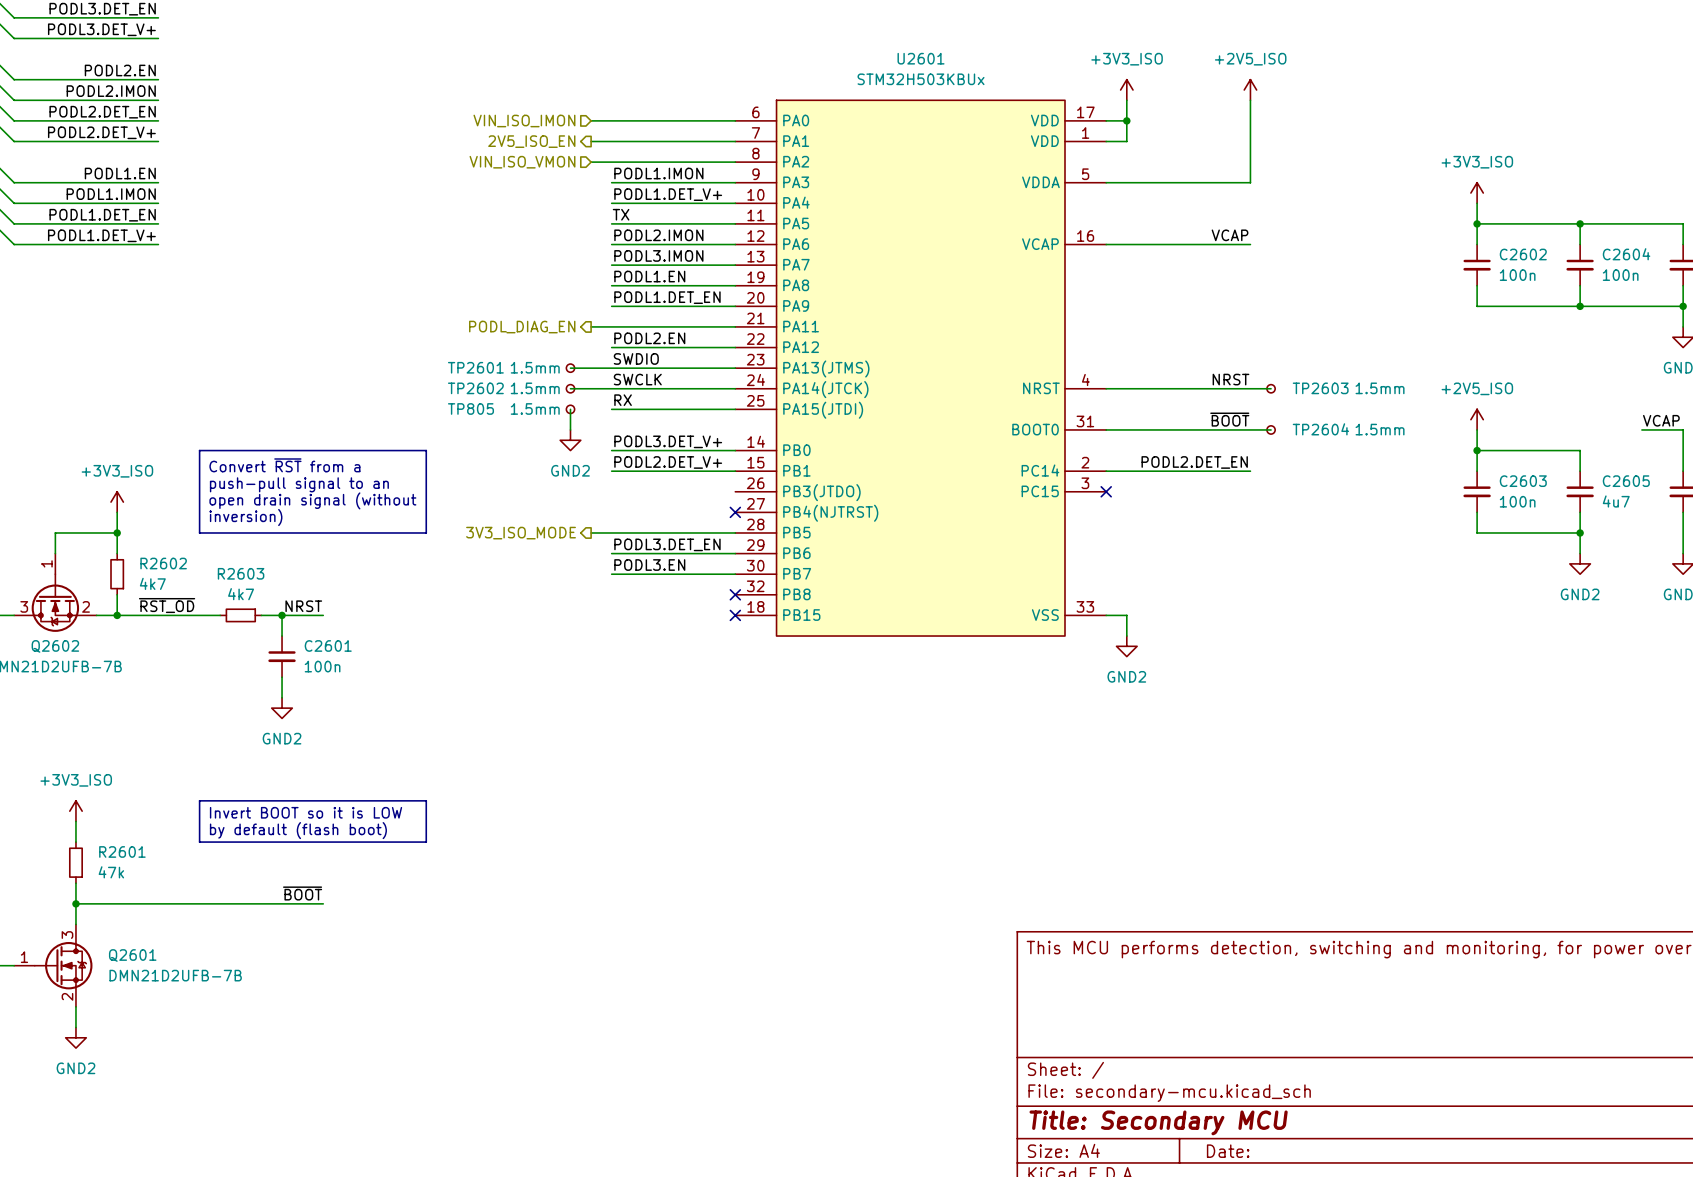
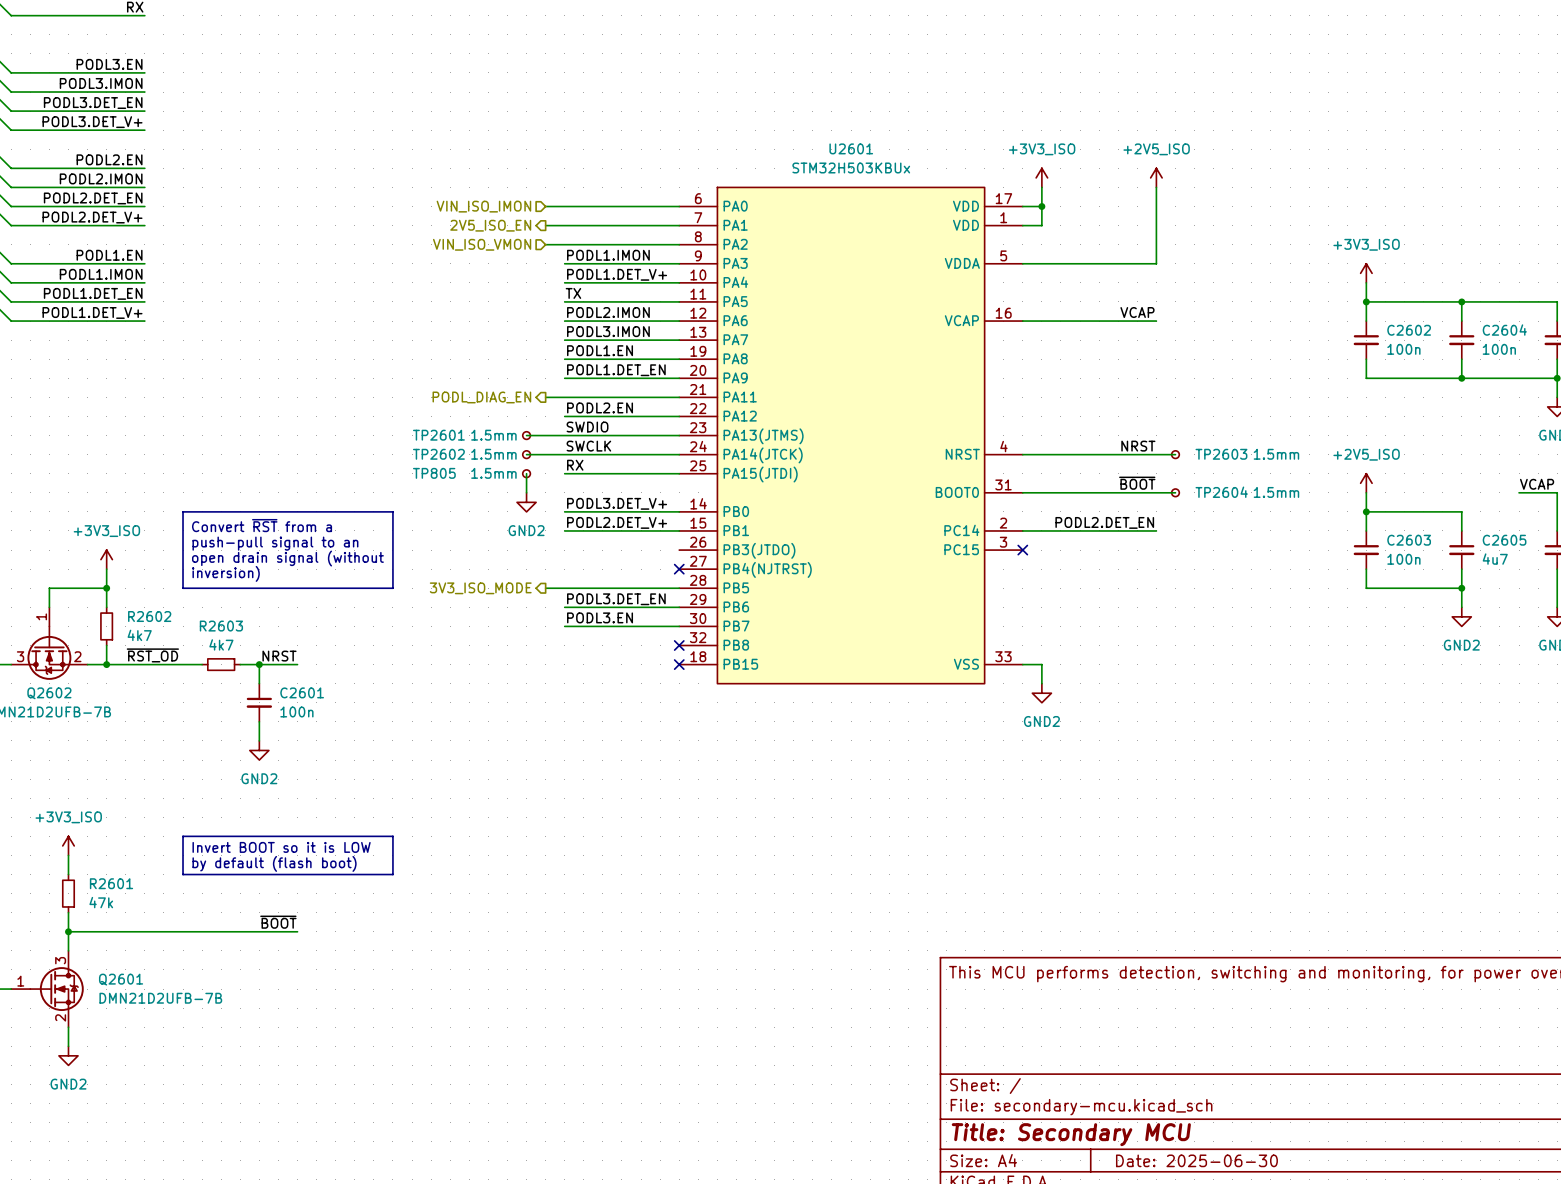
title block: Date: (1228, 1151) -> Date: 2025-06-30 (1196, 1160)

